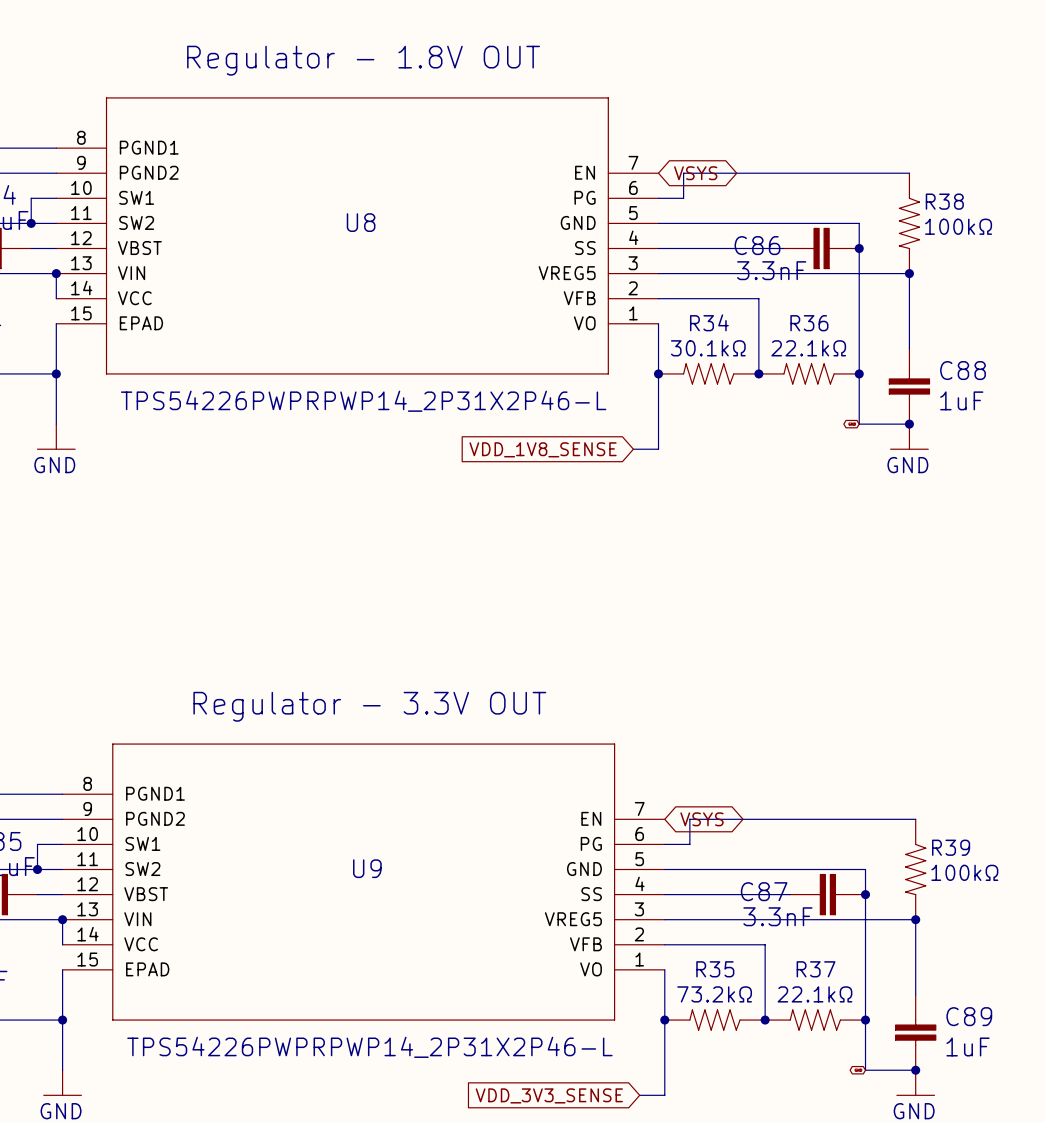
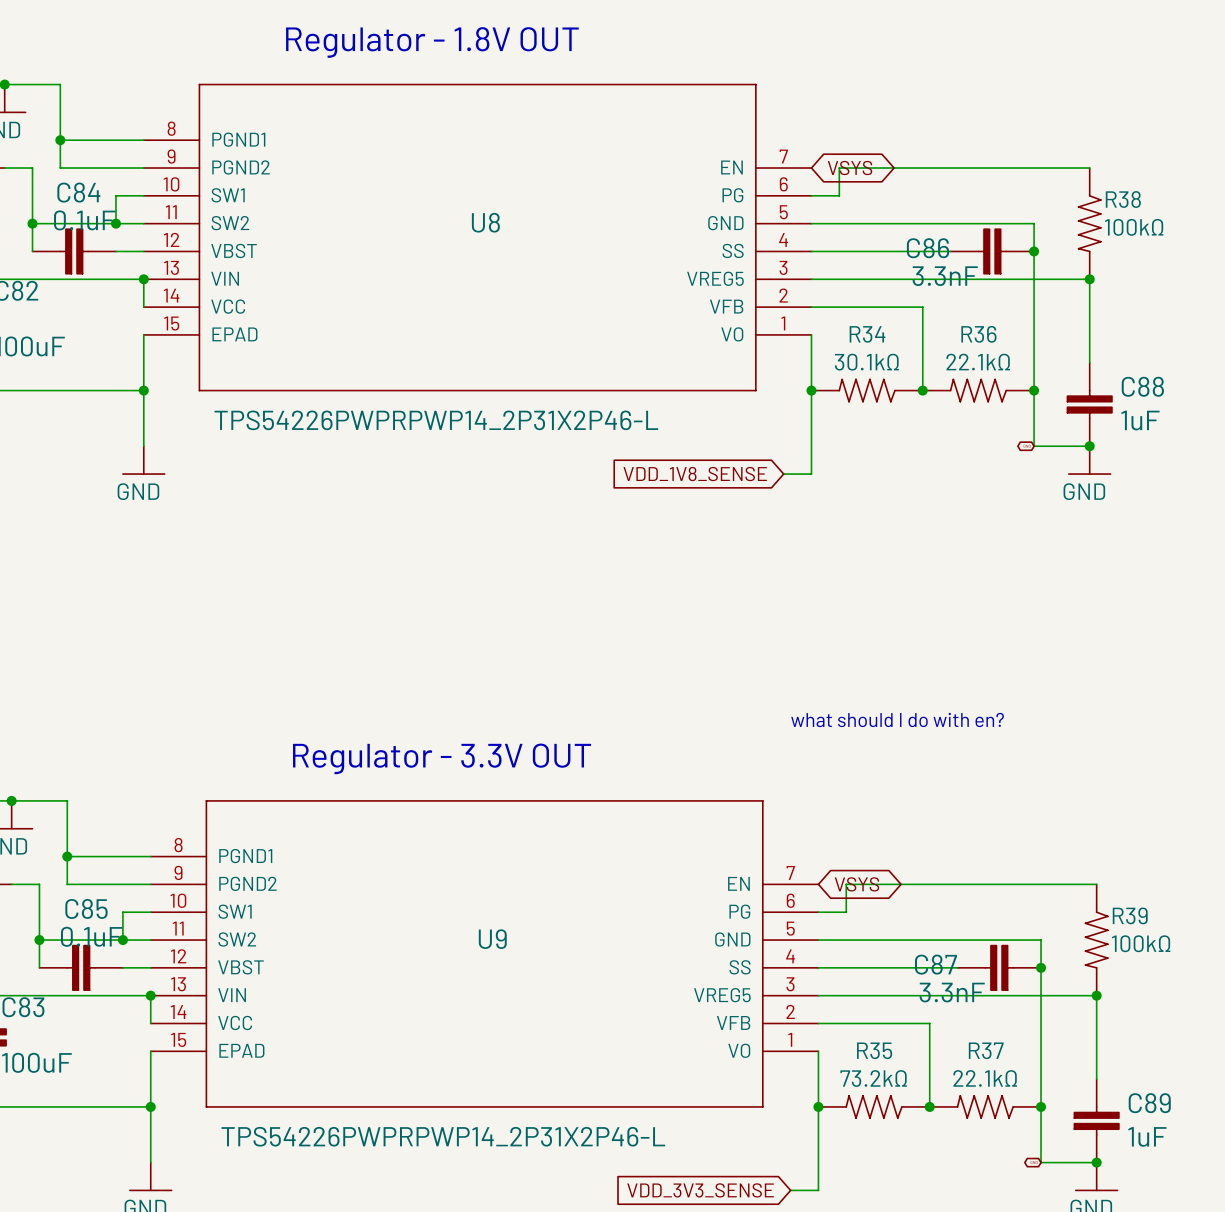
text: none -> what should I do with en? (897, 719)

